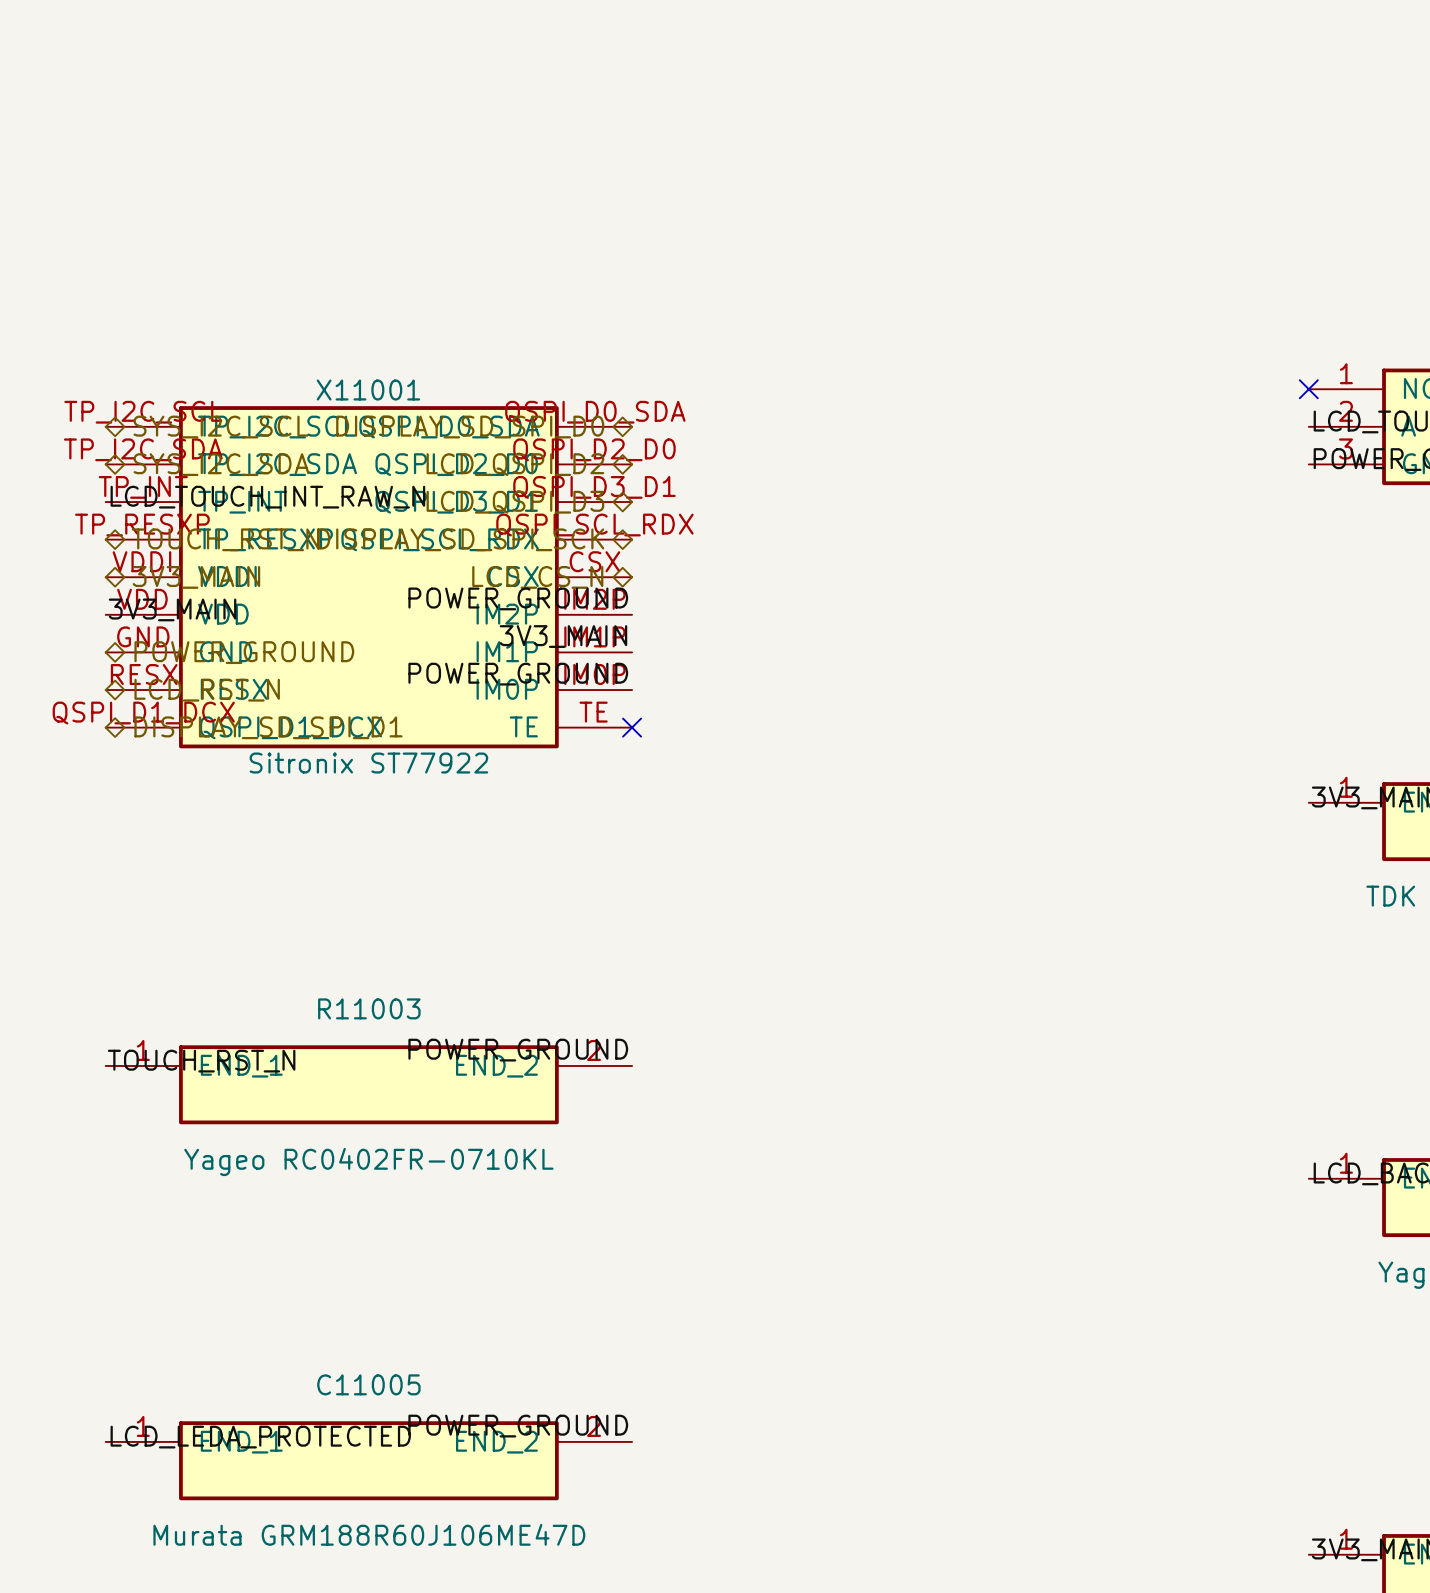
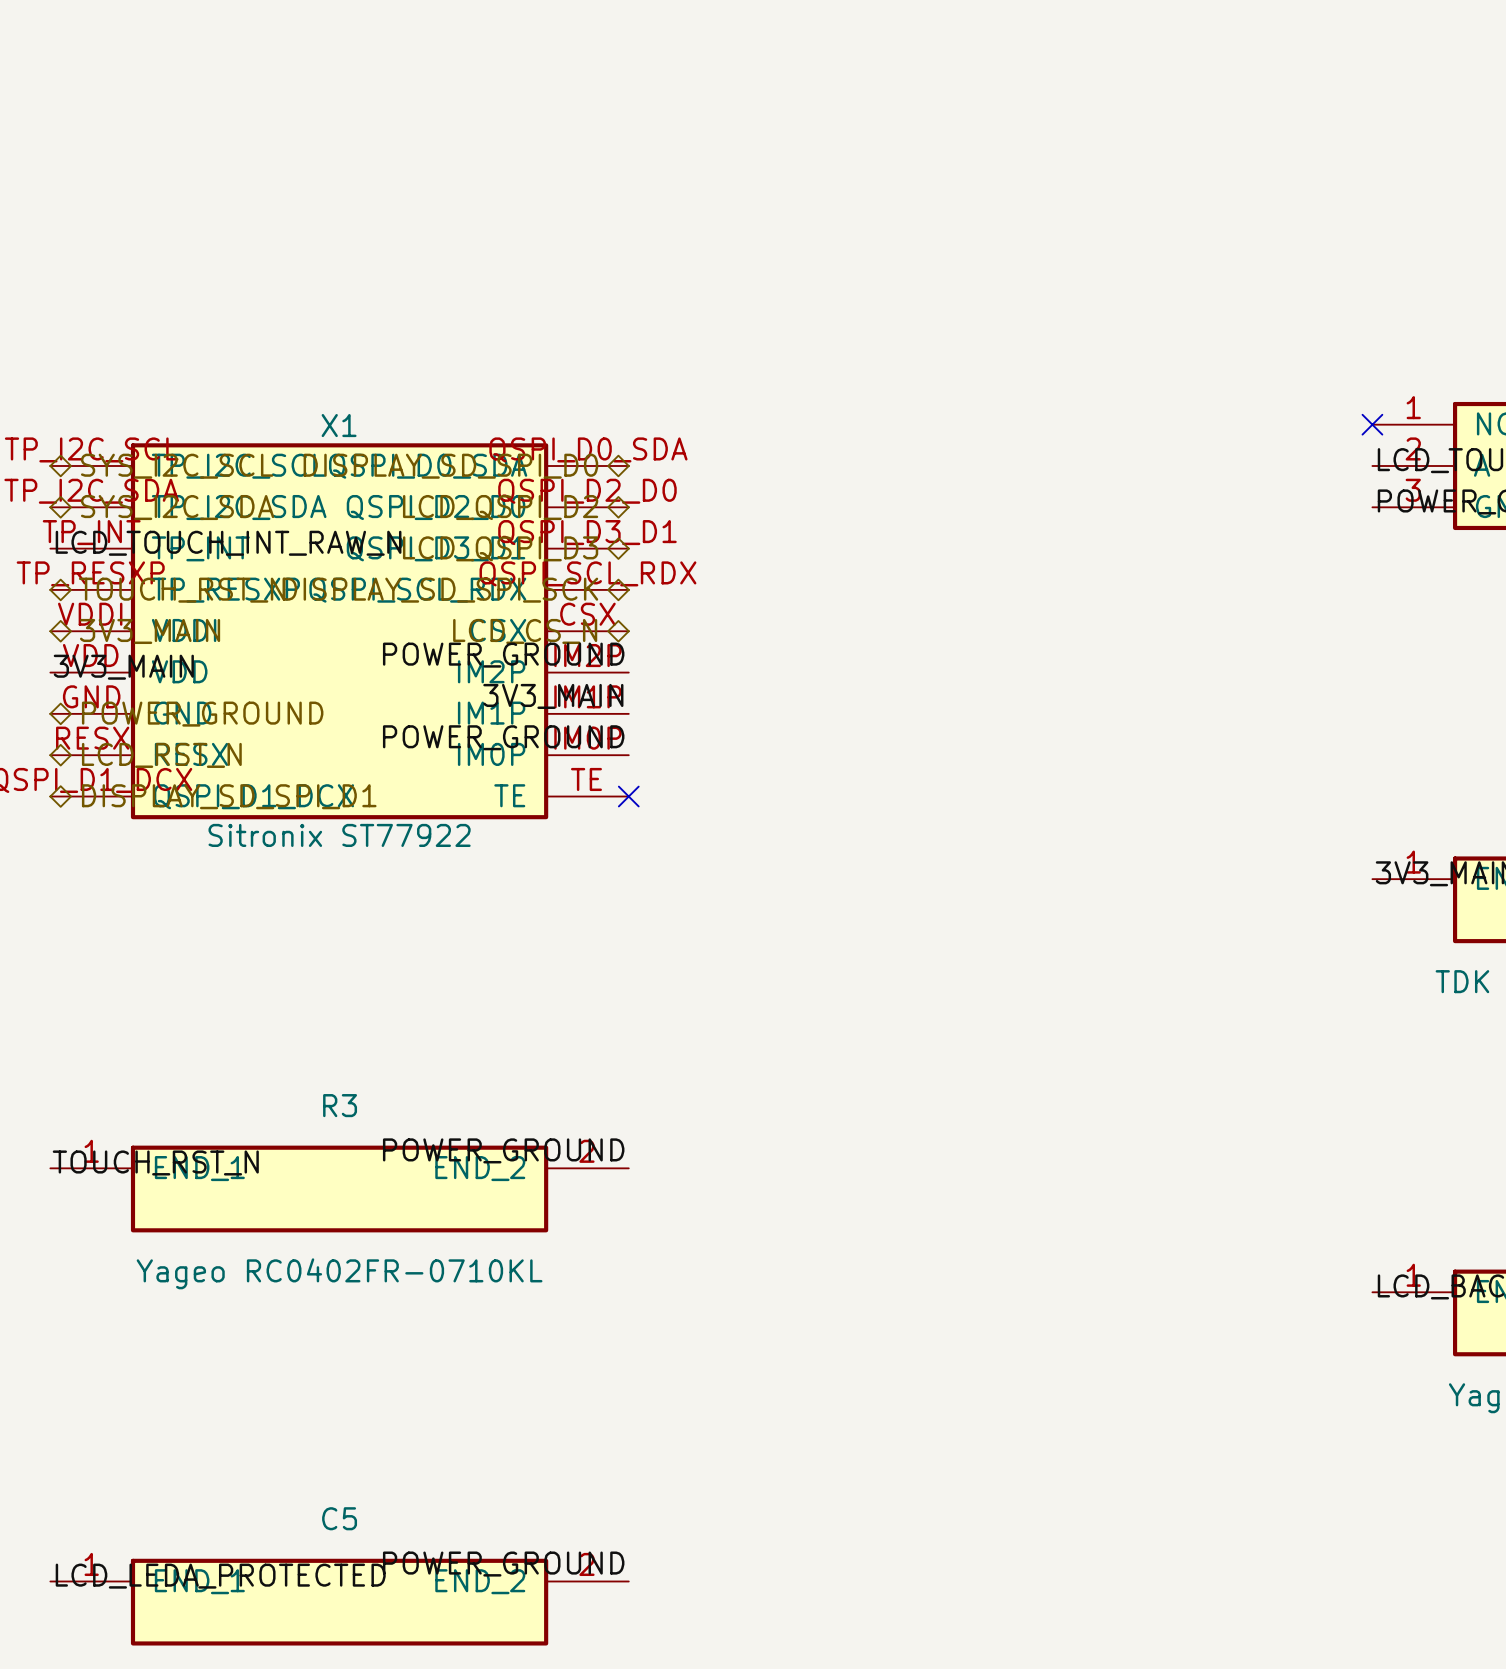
X11001 name: X11001 (368, 390) -> X1 (339, 425)
R11003 name: R11003 (369, 1008) -> R3 (340, 1105)
C11005 name: C11005 (368, 1384) -> C5 (339, 1518)

